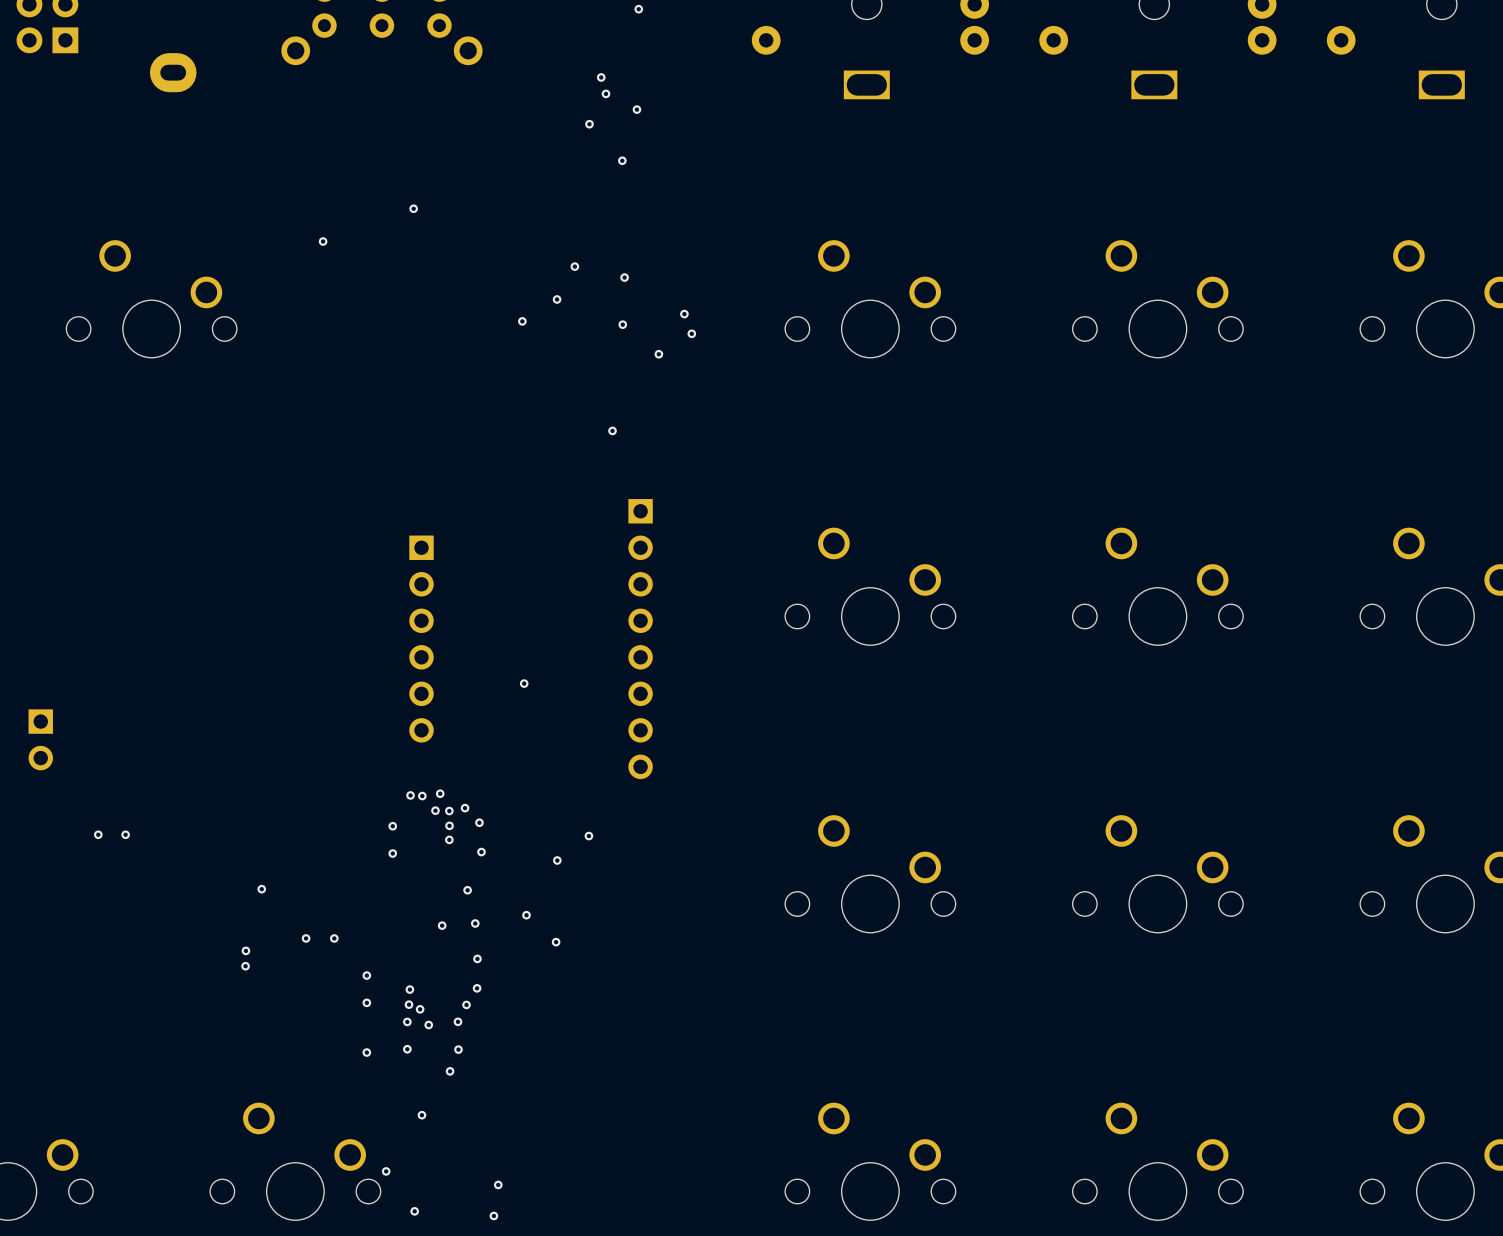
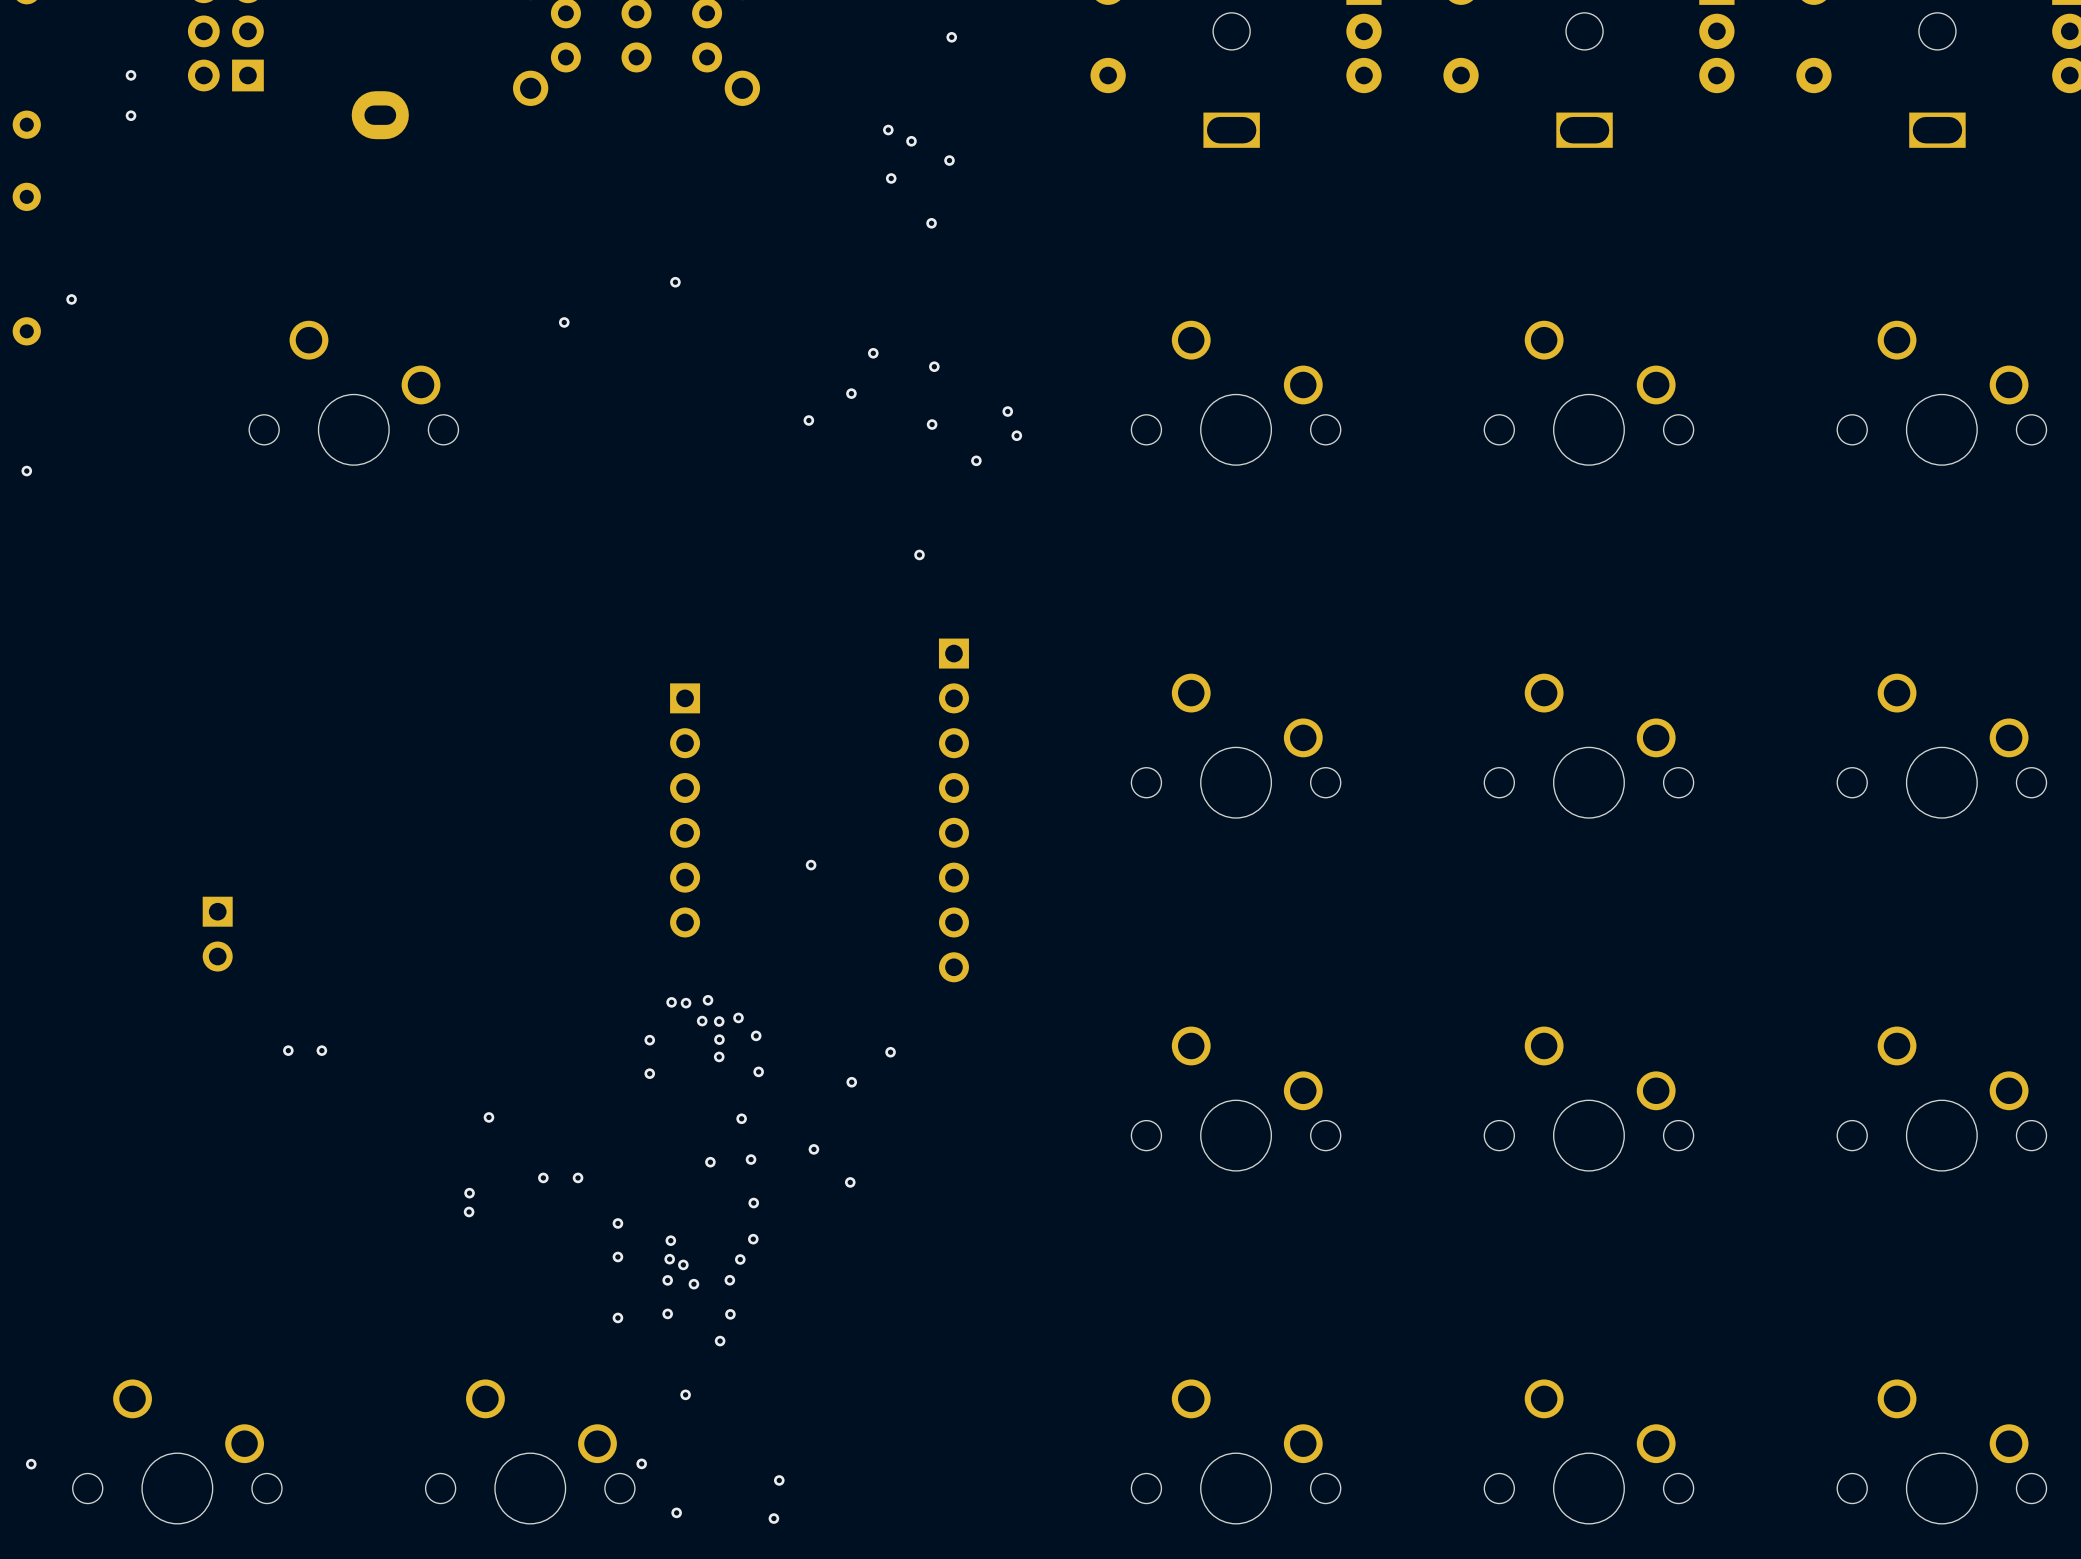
via position: (601, 77) -> (888, 130)

